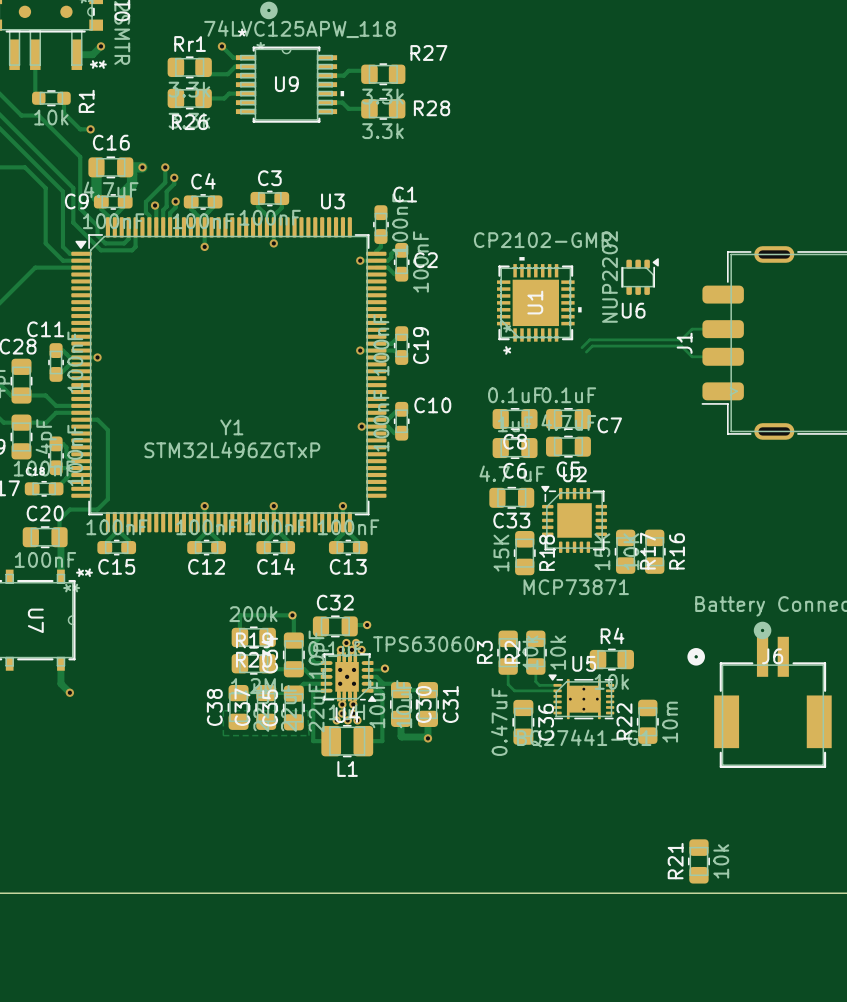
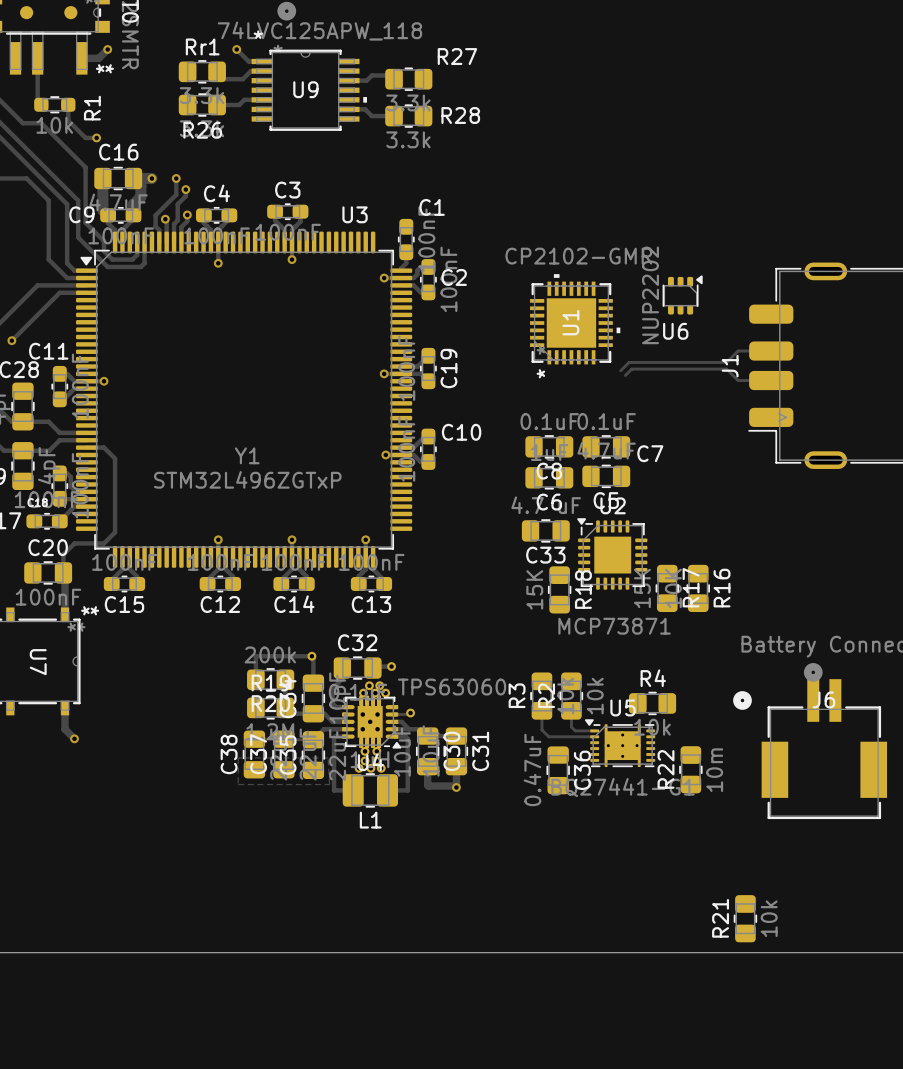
track: none -> (86, 292) (59, 292) (11, 340)
via: none -> (11, 340)

